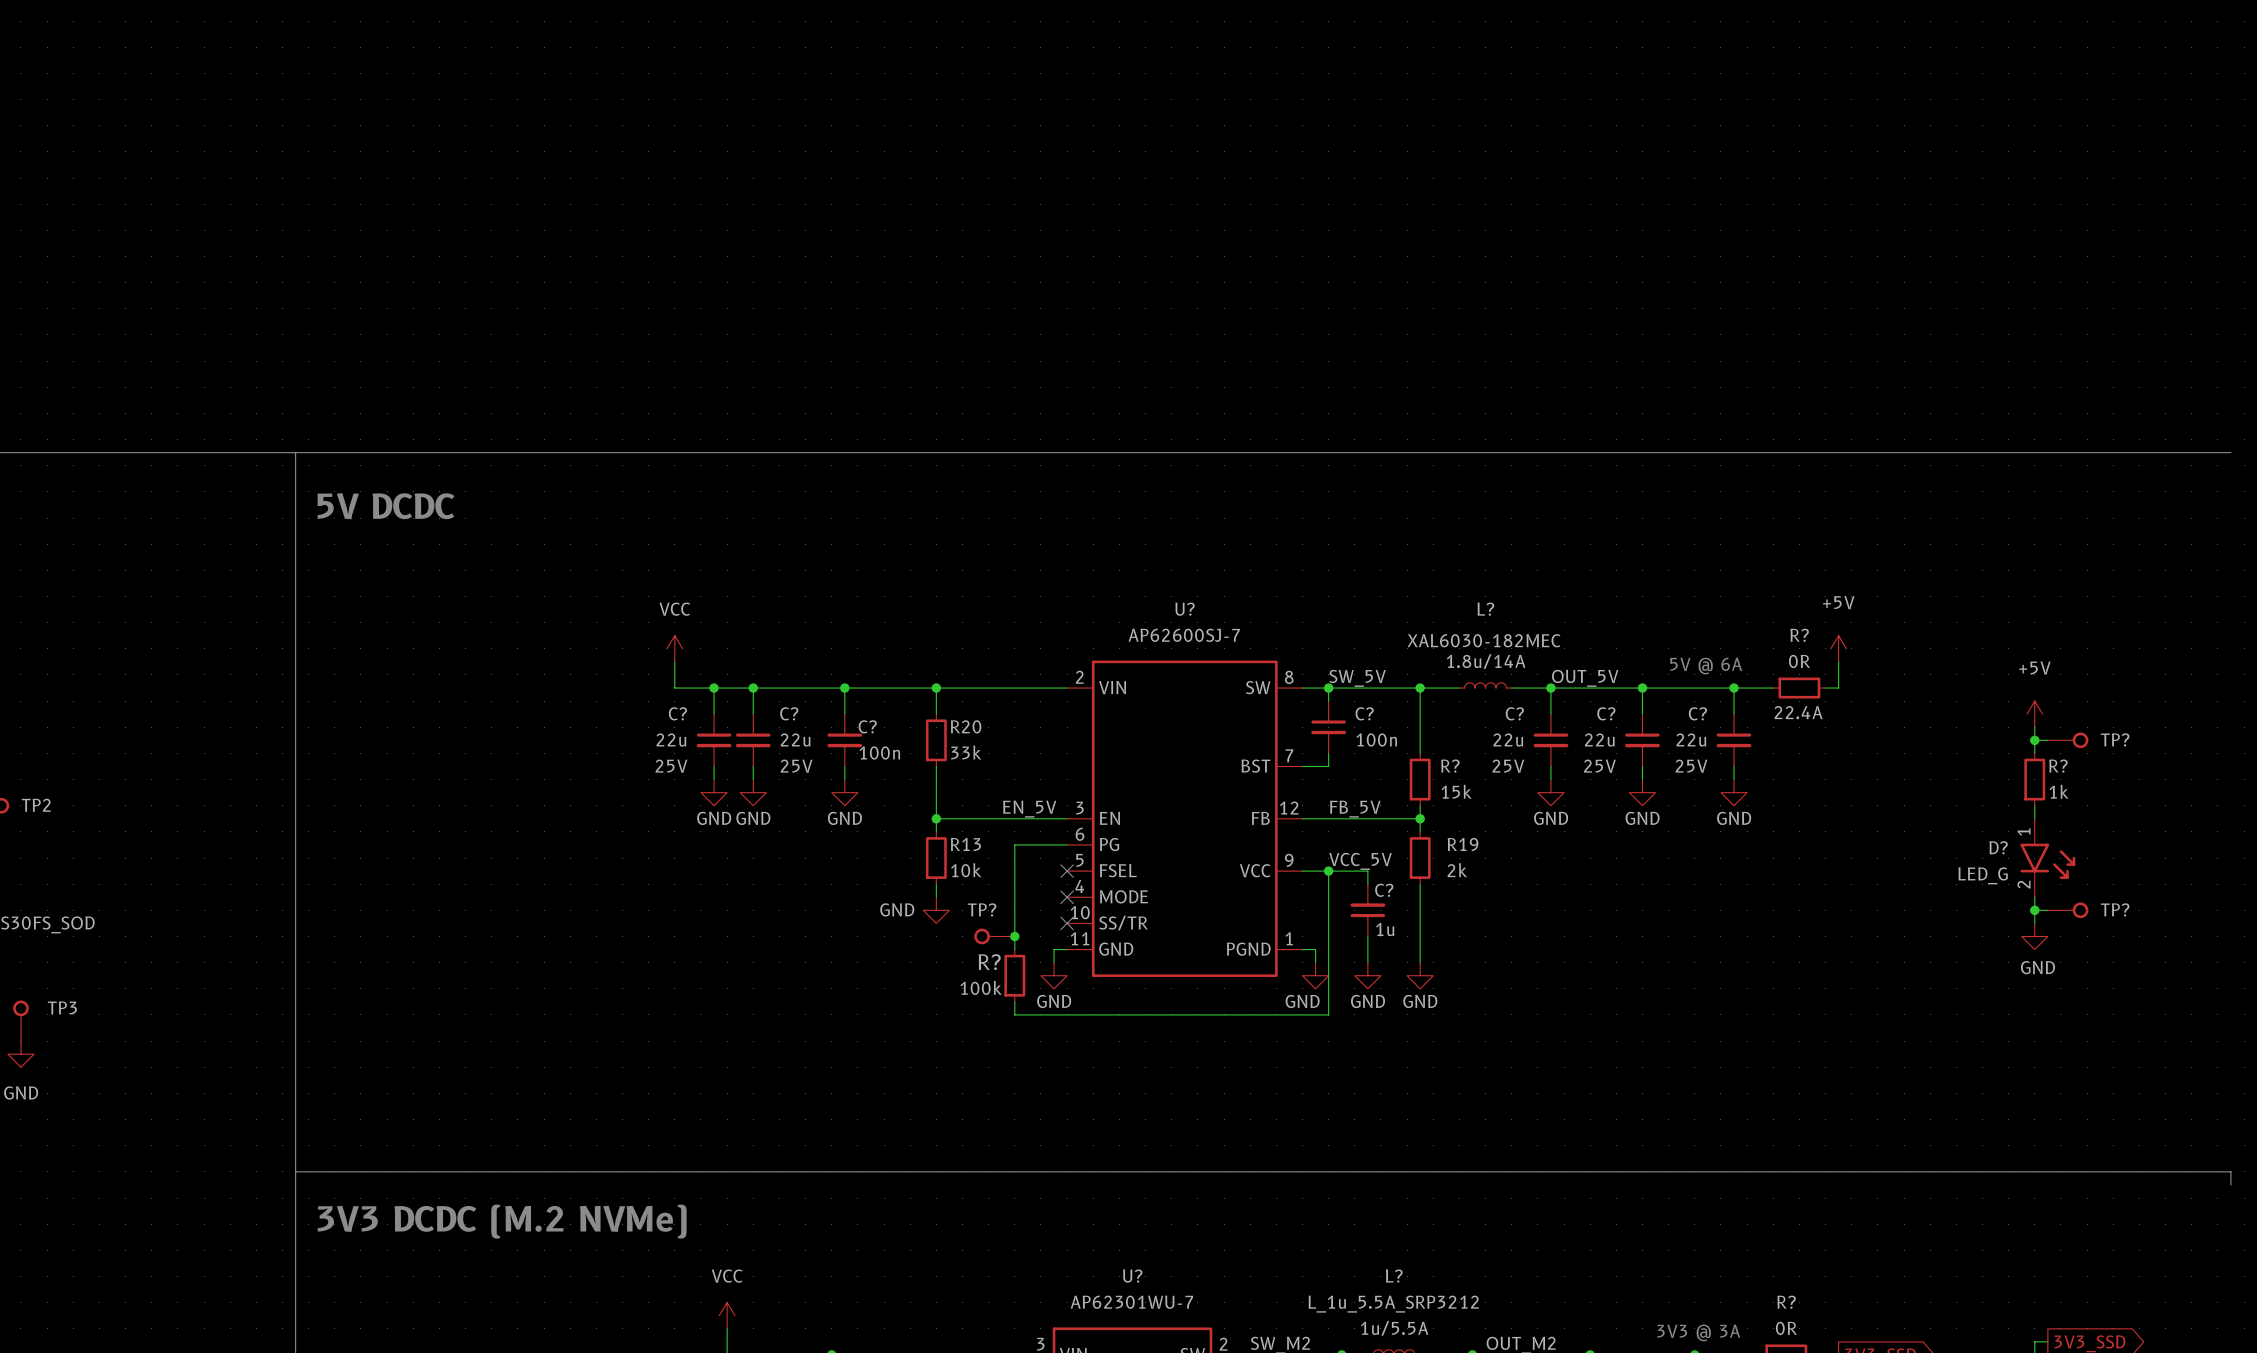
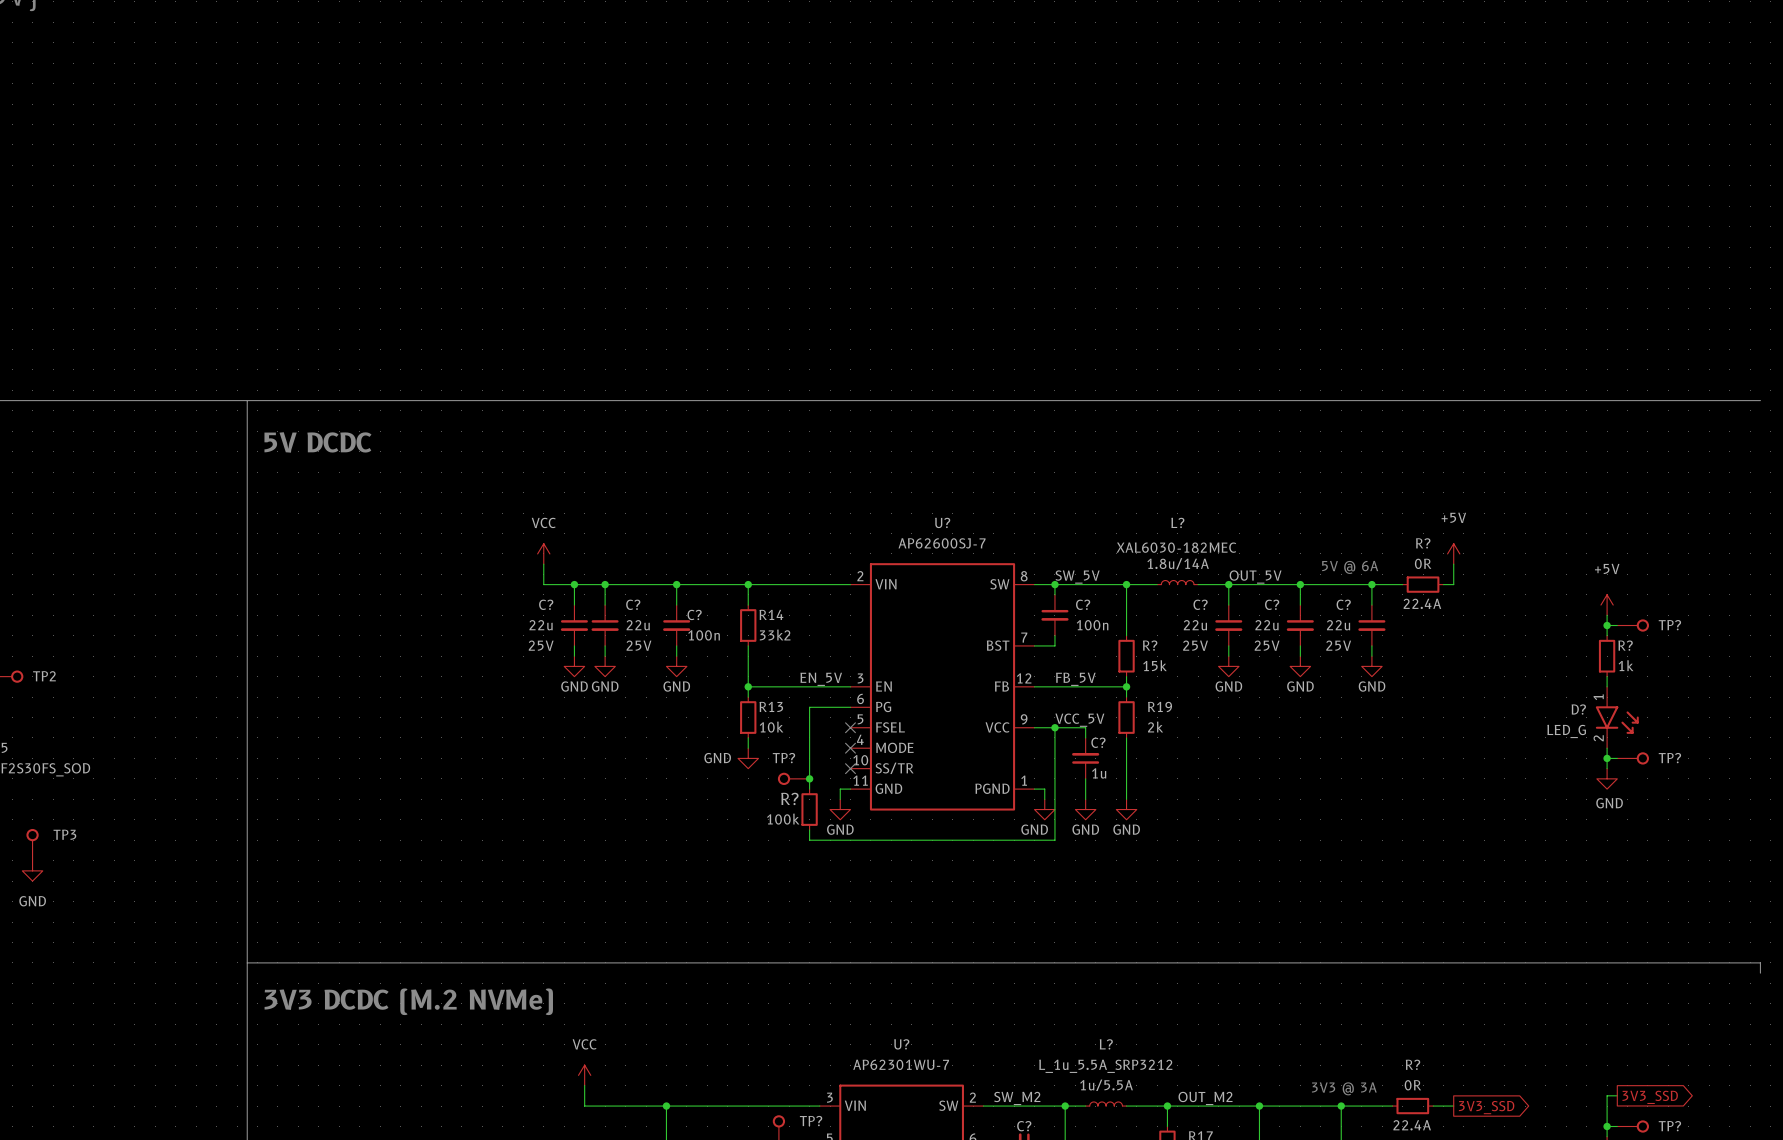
R20 name: R20 (966, 726) -> R14 (771, 614)
R20 text: 33k (966, 752) -> 33k2 (775, 635)

